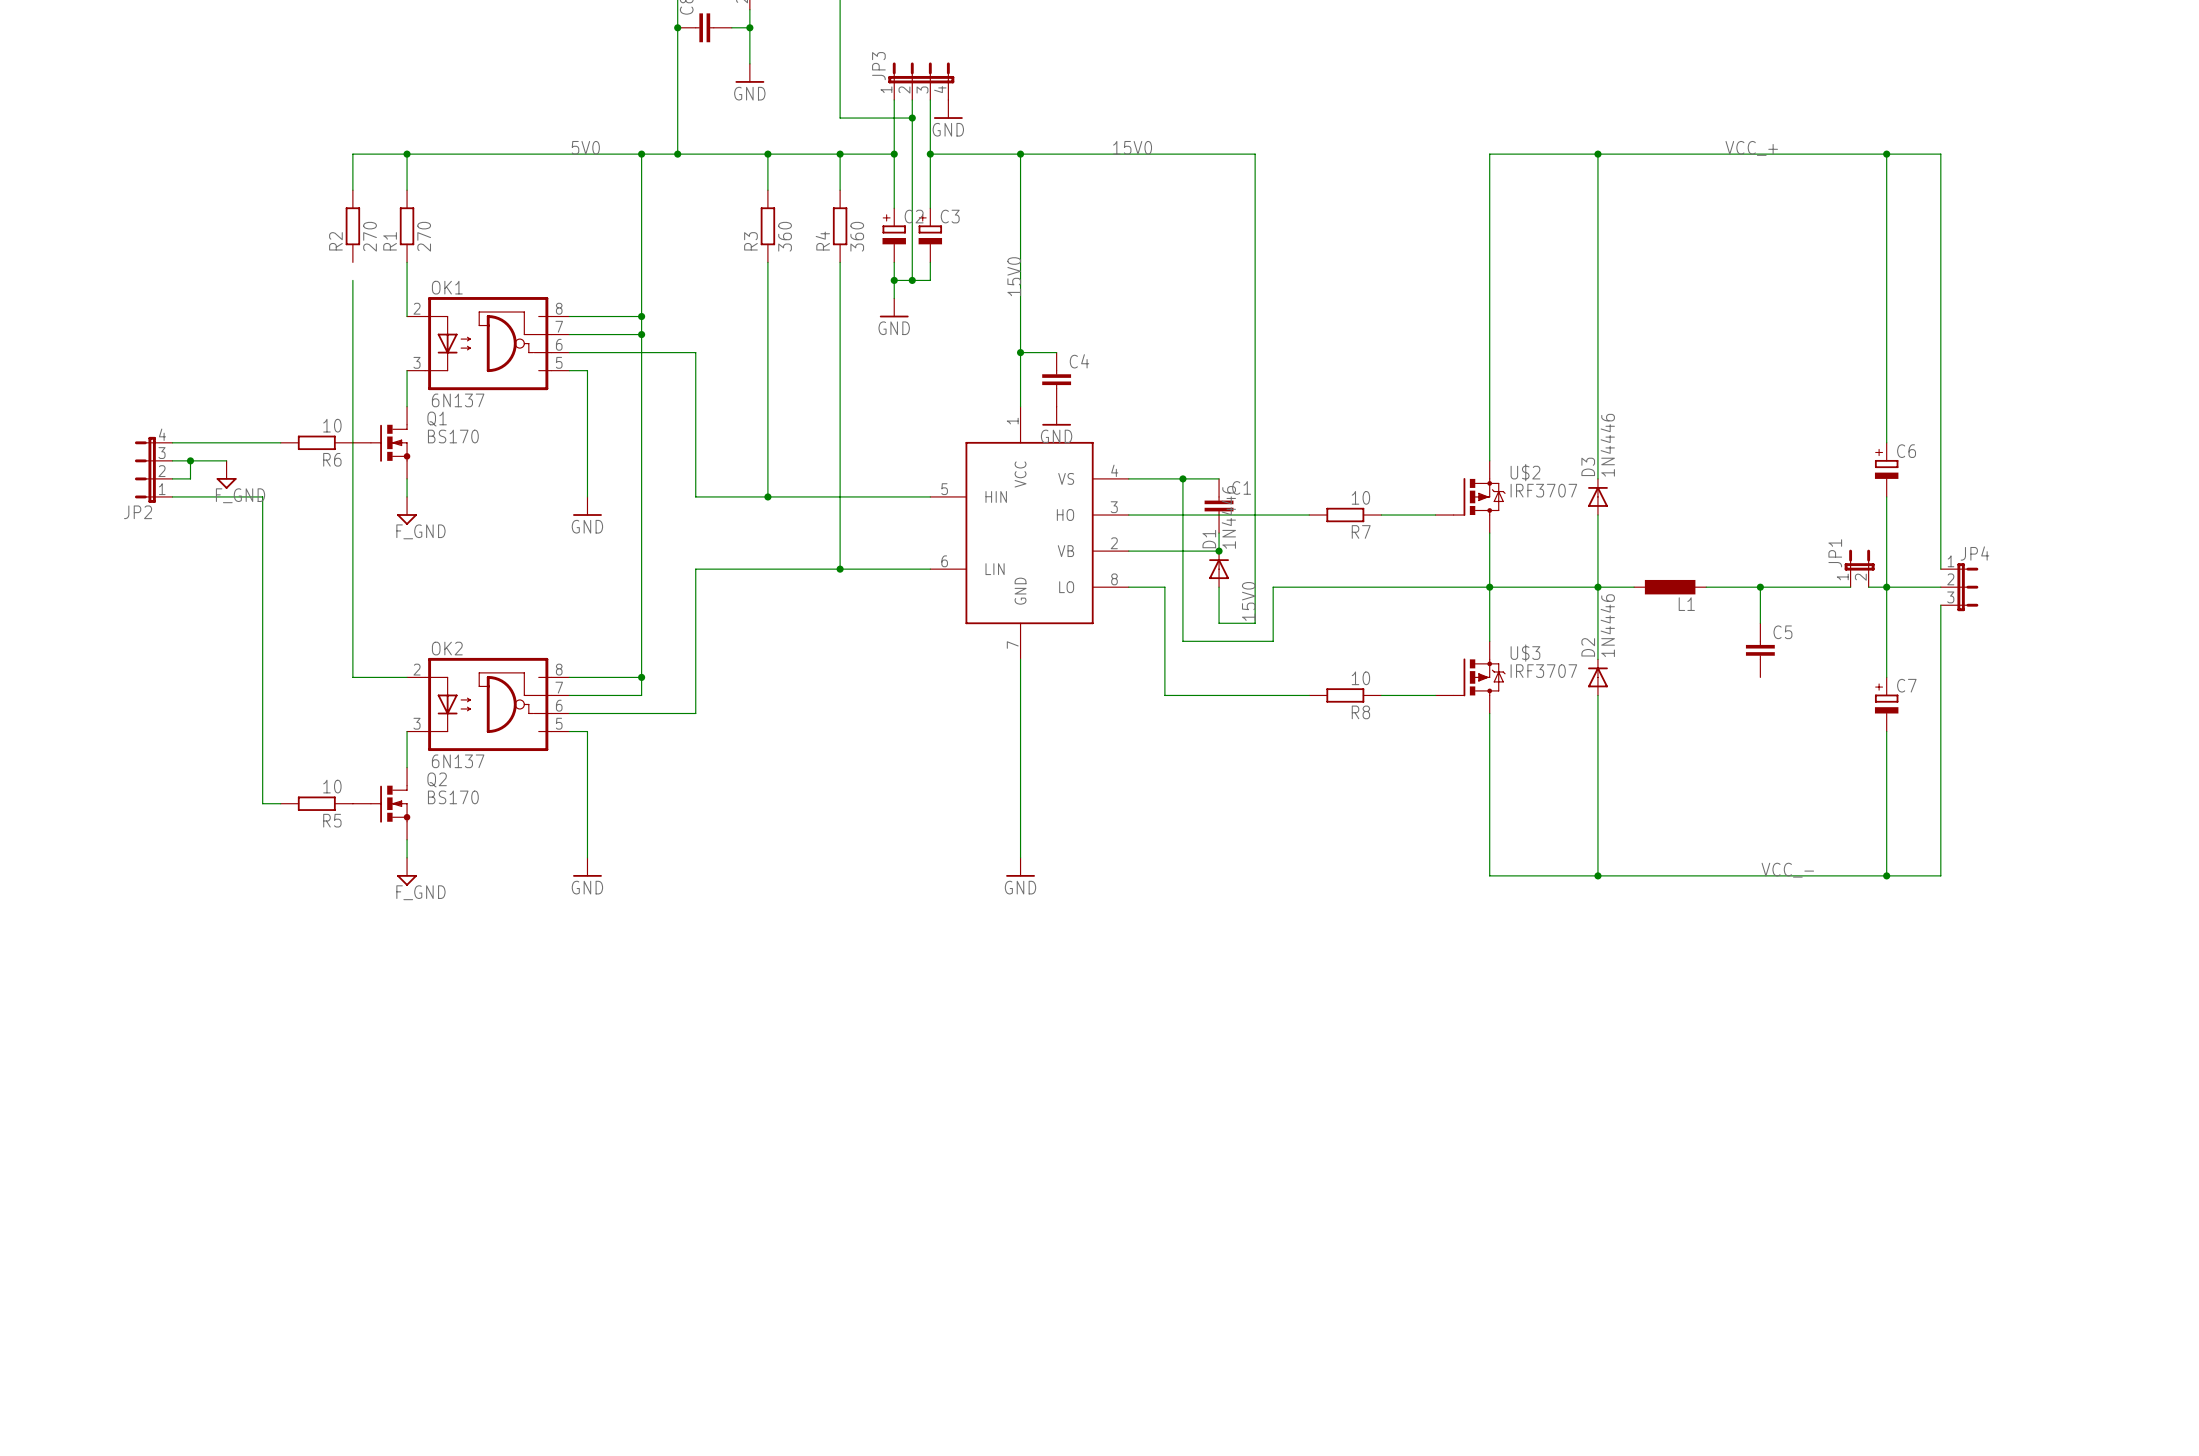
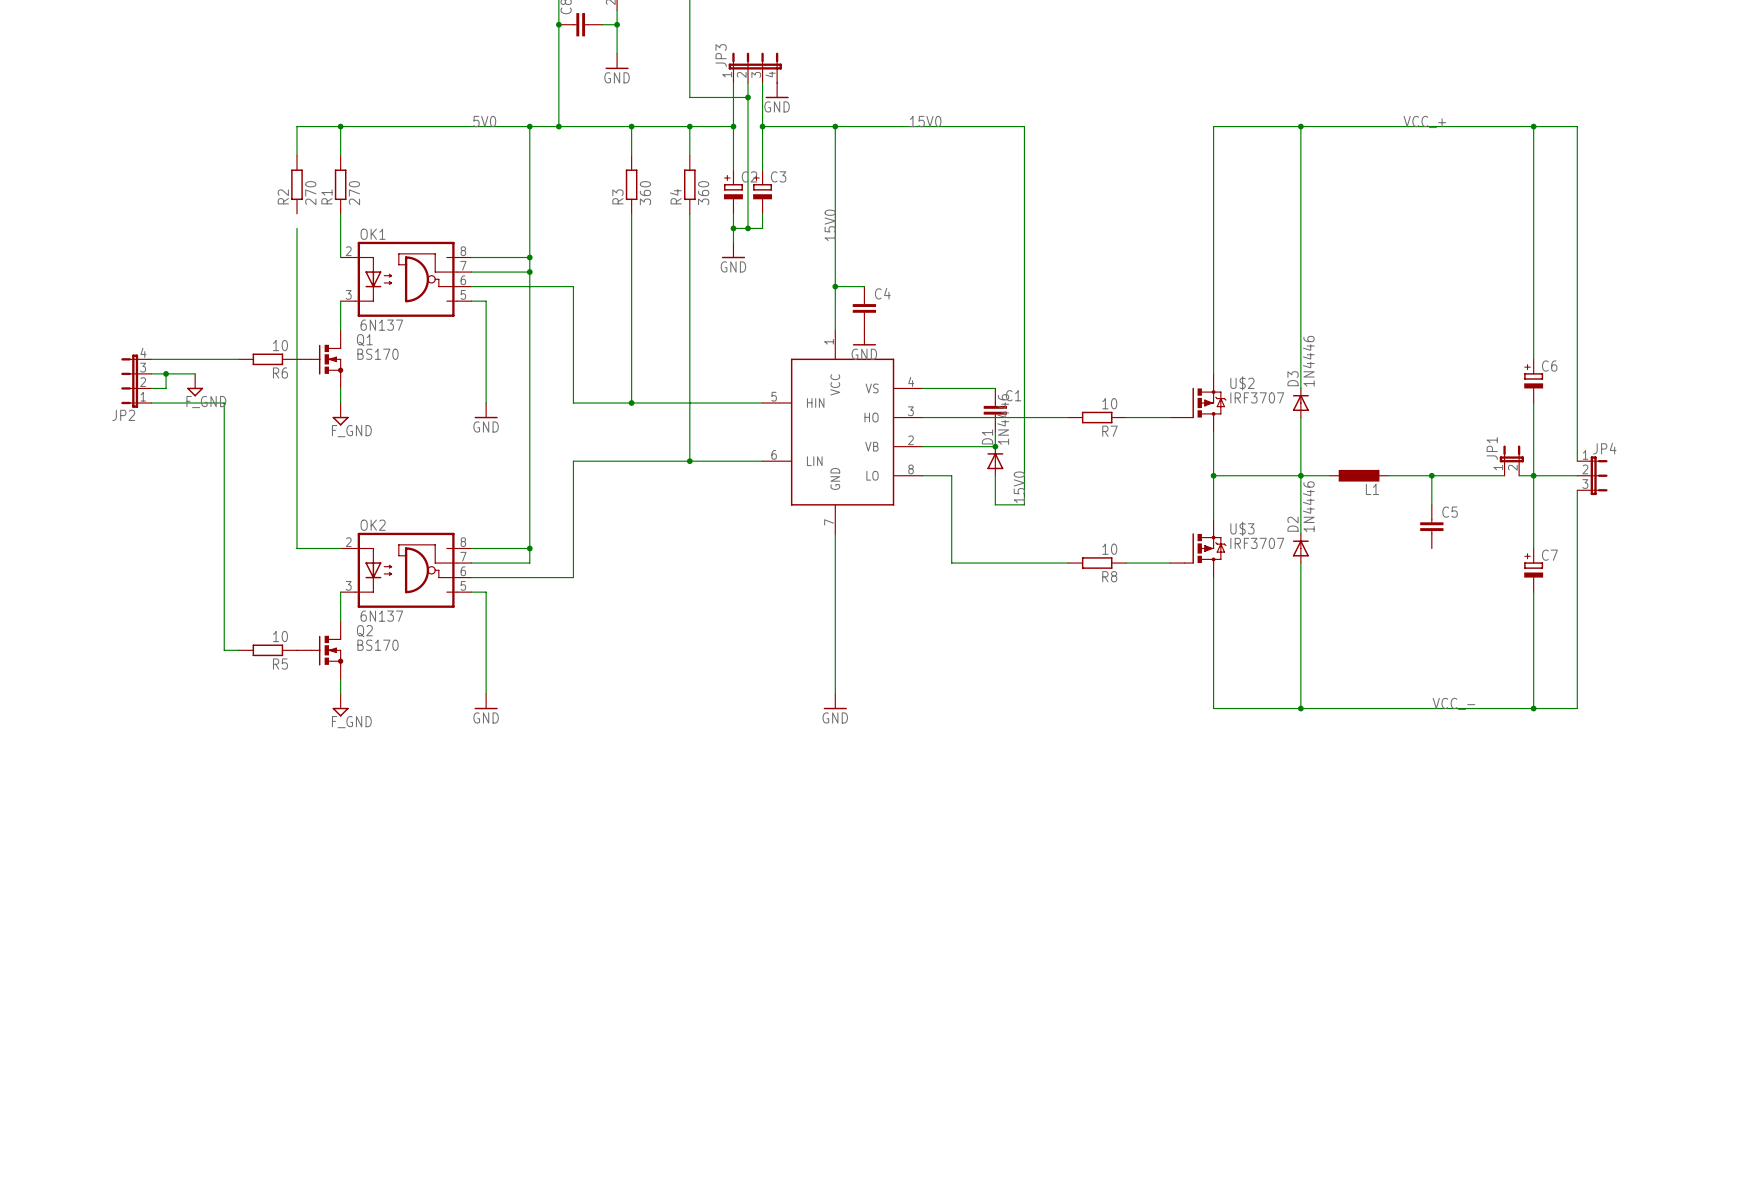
wire: (1182, 478) (1182, 641) (1273, 641) (1273, 587) (1489, 587) -> none
junction: (1182, 478) -> none

